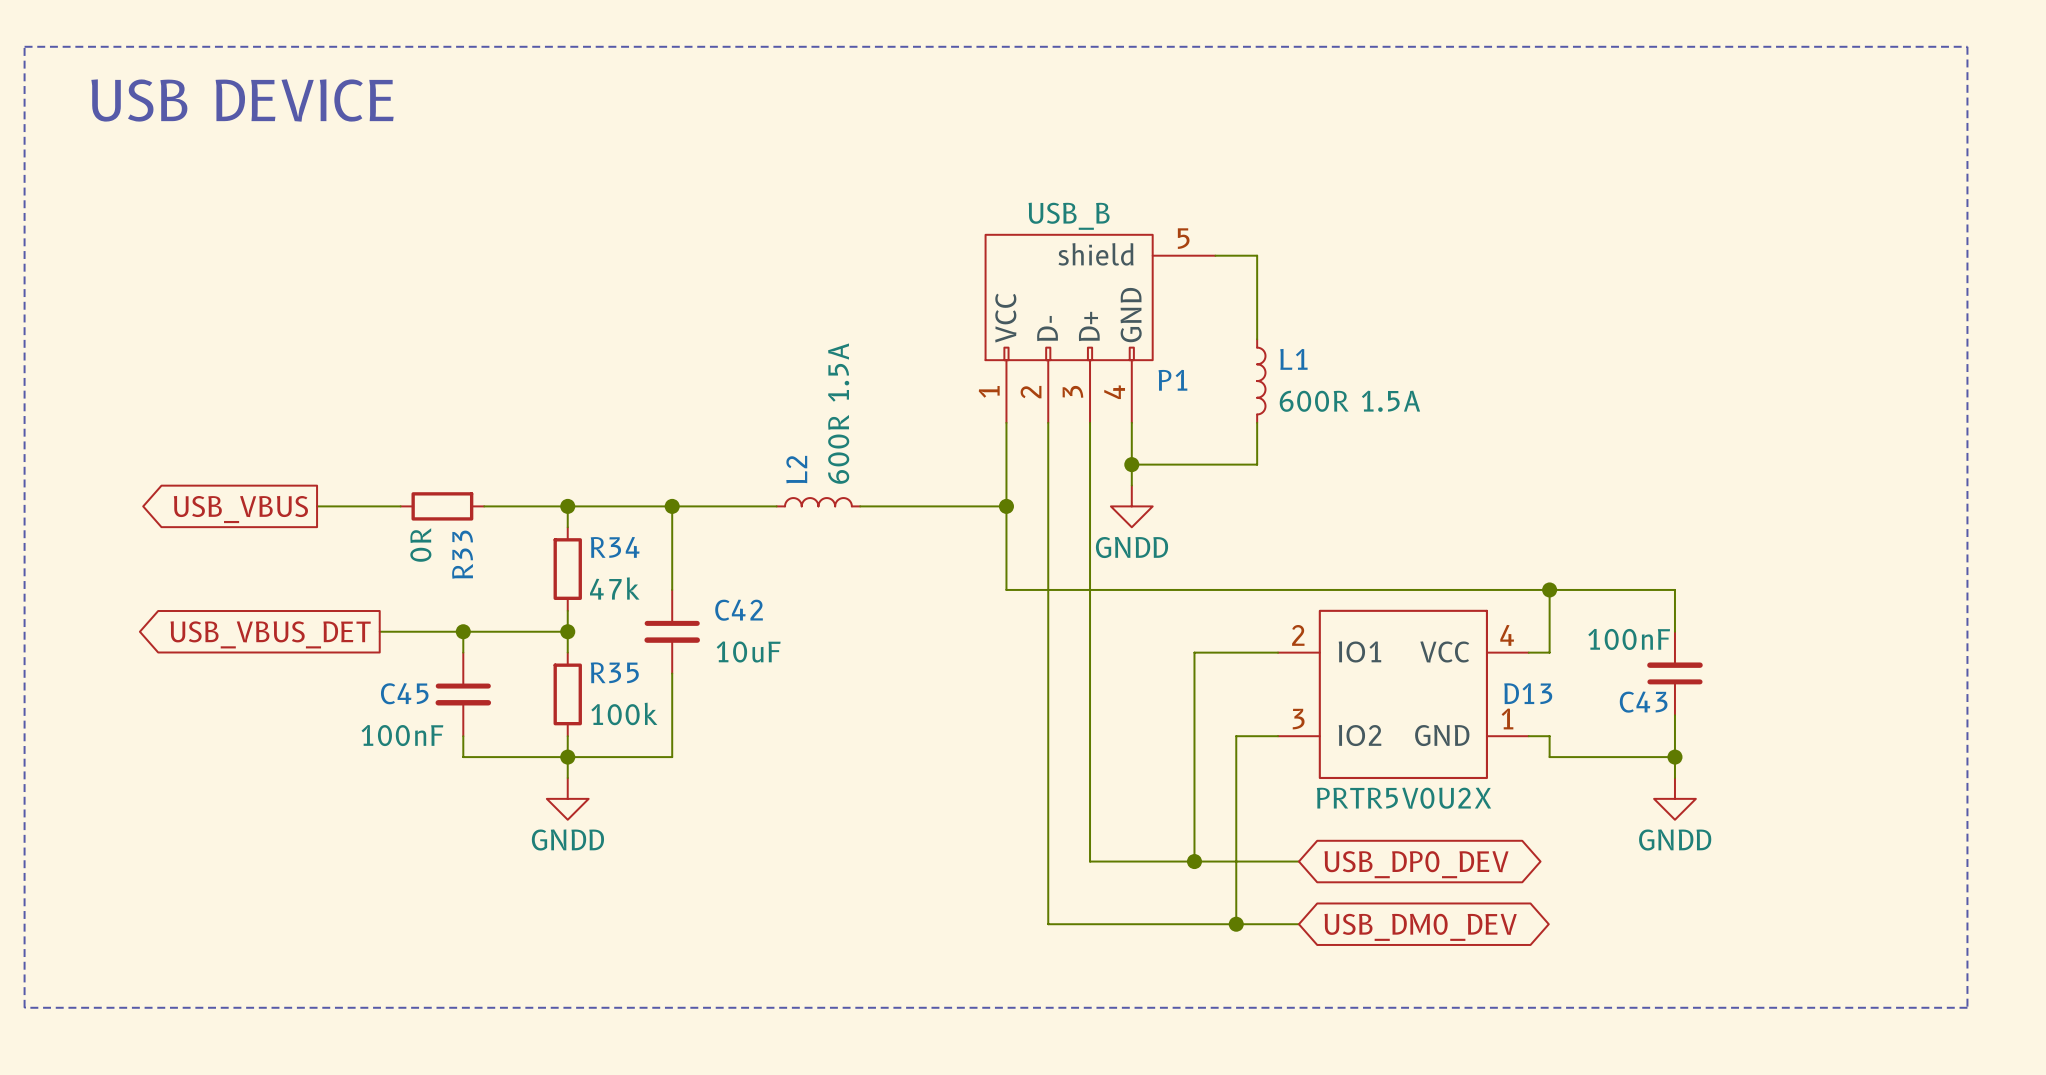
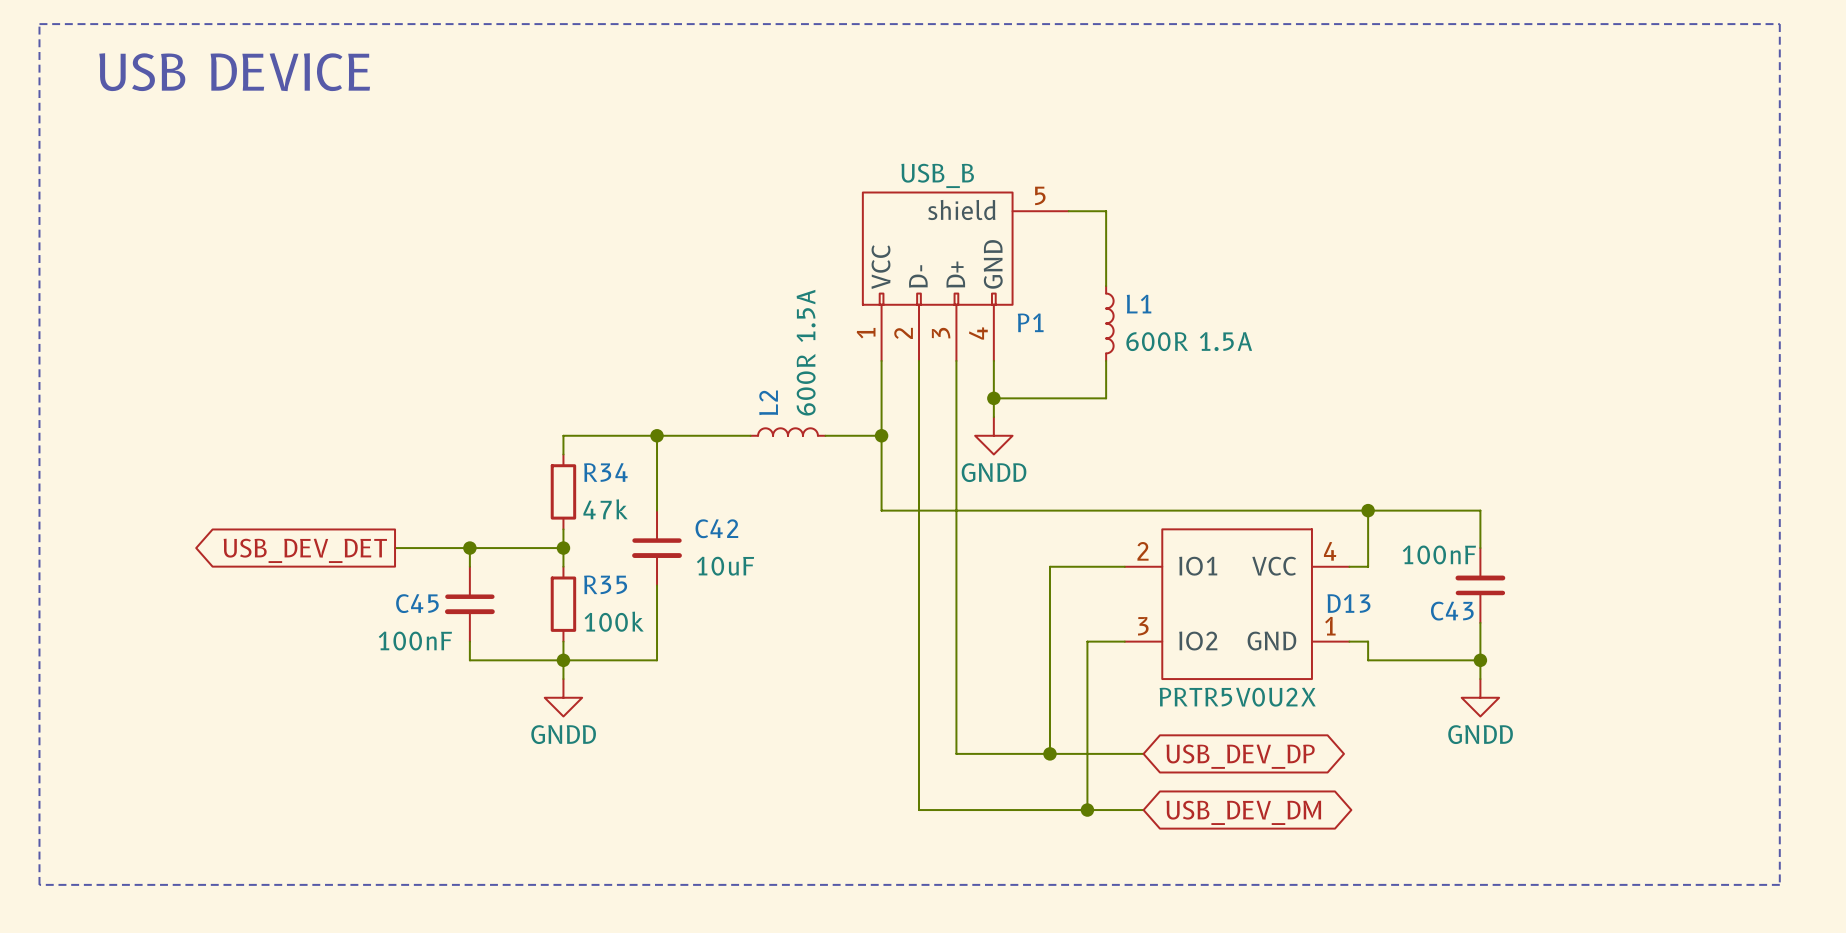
wire: (1215, 255) (1257, 255) (1257, 339) -> (1068, 211) (1106, 211) (1106, 286)
P1 position: (1100, 328) -> (965, 276)
L1 position: (1261, 381) -> (1109, 323)
wire: none -> (881, 360) (881, 510) (919, 510) (919, 810) (956, 810)
wire: (1131, 422) (1131, 485) -> none
wire: (1257, 422) (1257, 464) (1215, 464) -> (1106, 360) (1106, 398)
junction position: (1131, 464) -> (993, 398)
wire: (1090, 485) (1090, 861) -> none
L2 position: (818, 502) -> (788, 432)
wire: (317, 506) (400, 506) -> none
R33: 0R (442, 506) -> none
wire: (484, 506) (609, 506) -> (563, 454) (563, 435)
wire: (567, 506) (567, 527) -> none
junction: (567, 506) -> none
wire: (672, 506) (672, 589) -> (657, 435) (657, 510)
junction position: (672, 506) -> (657, 435)
wire: (860, 506) (902, 506) -> (713, 435) (750, 435)
wire: (964, 506) (1006, 506) -> (993, 398) (1031, 398)
junction position: (1006, 506) -> (881, 435)
power symbol position: GNDD (1131, 506) -> GNDD (993, 435)
global label: USB_VBUS (240, 509) -> none
R34 position: (567, 569) -> (563, 491)
wire: (1549, 589) (1549, 652) (1528, 652) -> (1368, 510) (1368, 566) (1349, 566)
junction position: (1549, 589) -> (1368, 510)
wire: (1633, 589) (1674, 589) (1674, 631) -> (1480, 510) (1480, 548)
wire: (567, 610) (567, 652) -> (563, 529) (563, 566)
wire: (379, 631) (421, 631) -> (526, 548) (563, 548)
wire: (463, 631) (463, 652) -> (469, 548) (469, 566)
junction: (463, 631) -> none
junction: none -> (469, 548)
junction: (567, 631) -> none
junction: none -> (563, 548)
C42 position: (672, 631) -> (657, 548)
global label: USB_VBUS_DET (270, 634) -> USB_DEV_DET (305, 550)
wire: (1194, 652) (1194, 736) -> (1124, 641) (1087, 641)
wire: none -> (1087, 566) (1049, 566) (1049, 753)
wire: (672, 673) (672, 757) -> (657, 585) (657, 660) (619, 660)
C43 position: (1674, 673) -> (1480, 585)
C45 position: (463, 694) -> (469, 604)
R35 position: (567, 694) -> (563, 604)
D13 position: (1403, 694) -> (1237, 604)
wire: (1674, 715) (1674, 777) -> (1480, 622) (1480, 679)
wire: (463, 736) (463, 757) (505, 757) -> (469, 641) (469, 660)
wire: (567, 736) (567, 777) -> (563, 641) (563, 679)
wire: (1278, 736) (1236, 736) (1236, 924) -> none
wire: (1528, 736) (1549, 736) (1549, 757) -> (1349, 641) (1368, 641) (1368, 660) (1405, 660)
junction position: (567, 757) -> (563, 660)
wire: (1633, 757) (1674, 757) -> none
junction position: (1674, 757) -> (1480, 660)
power symbol position: GNDD (567, 798) -> GNDD (563, 697)
power symbol position: GNDD (1674, 798) -> GNDD (1480, 697)
wire: (1048, 861) (1048, 924) -> (956, 753) (993, 753)
junction: none -> (1049, 753)
wire: none -> (1087, 753) (1087, 810)
junction: (1194, 861) -> none
wire: (1257, 861) (1298, 861) -> none
global label: USB_DP0_DEV (1416, 864) -> USB_DEV_DP (1240, 756)
junction: none -> (1087, 810)
junction: (1236, 924) -> none
wire: (1257, 924) (1298, 924) -> none
global label: USB_DM0_DEV (1420, 927) -> USB_DEV_DM (1243, 812)

